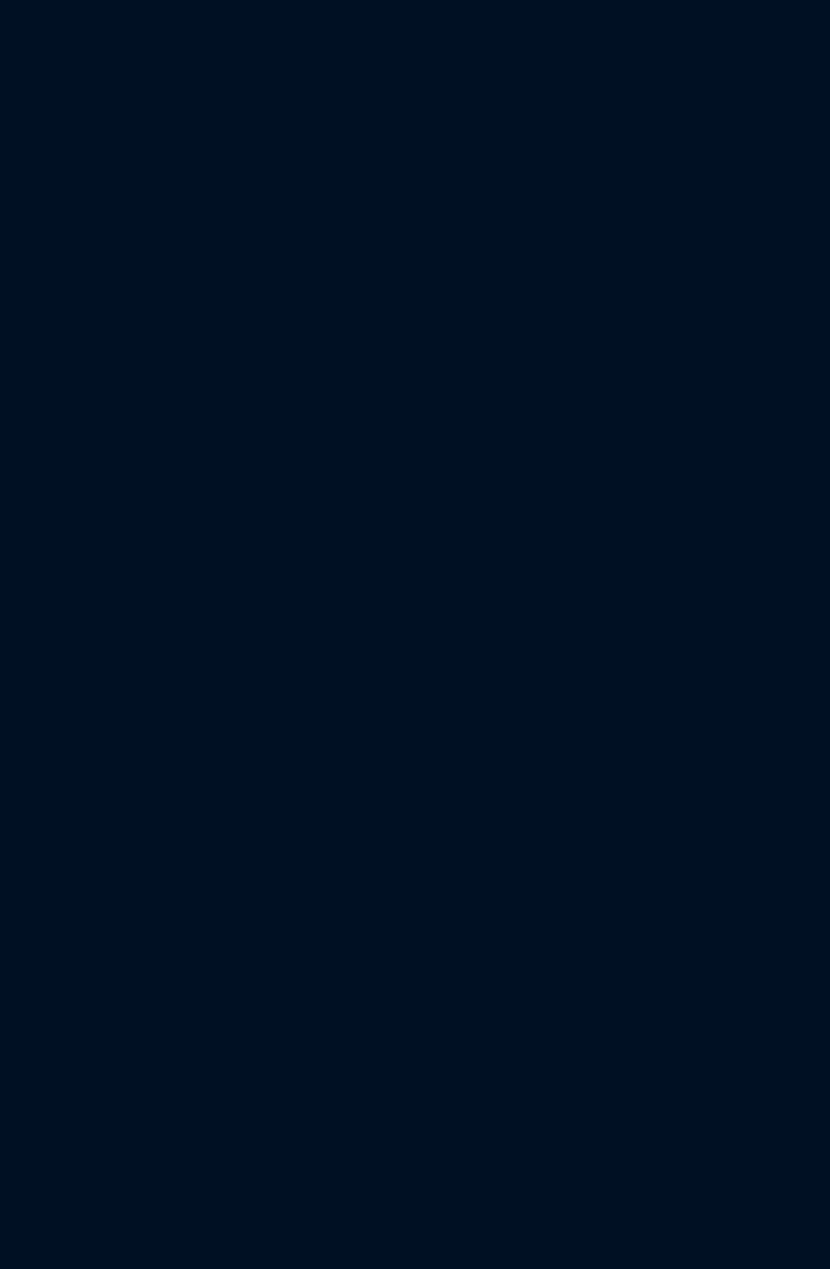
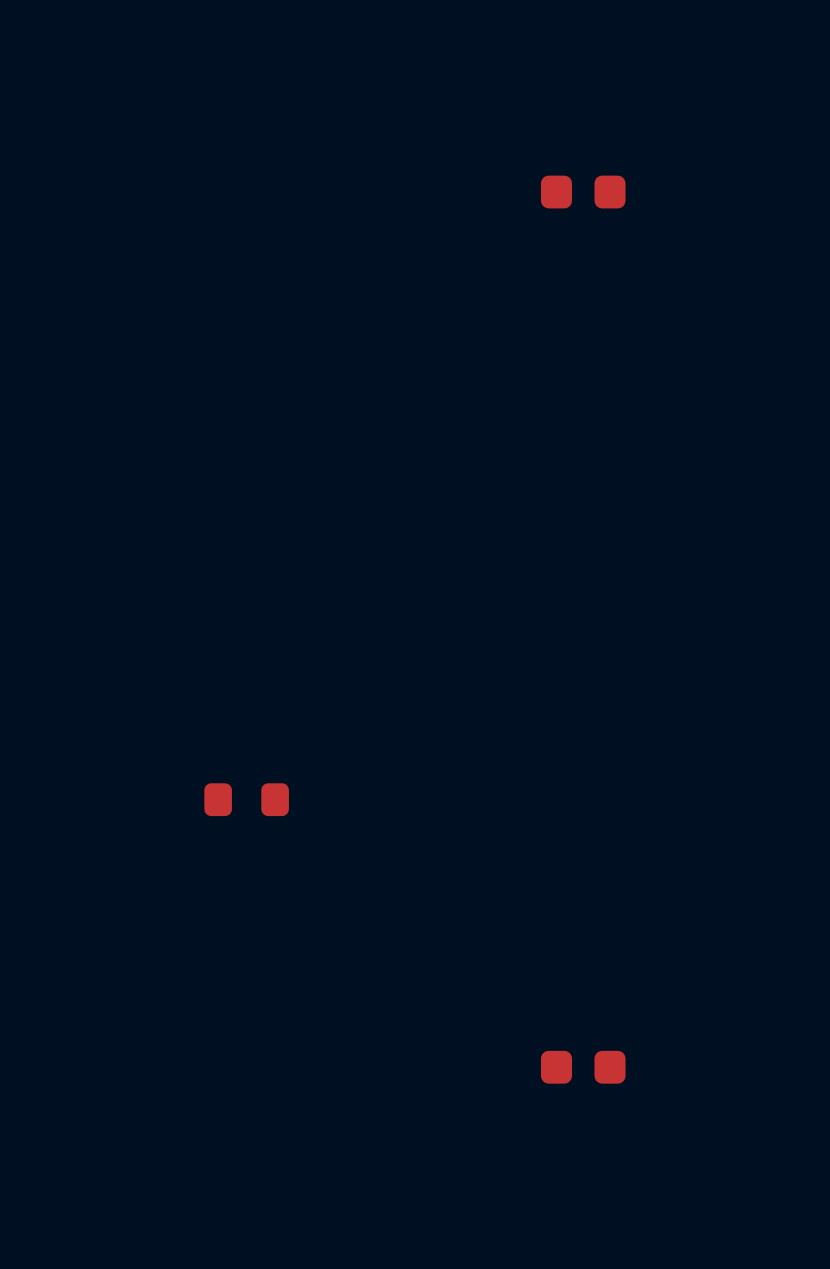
part: none -> (583, 192)
part: none -> (246, 799)
part: none -> (583, 1067)

